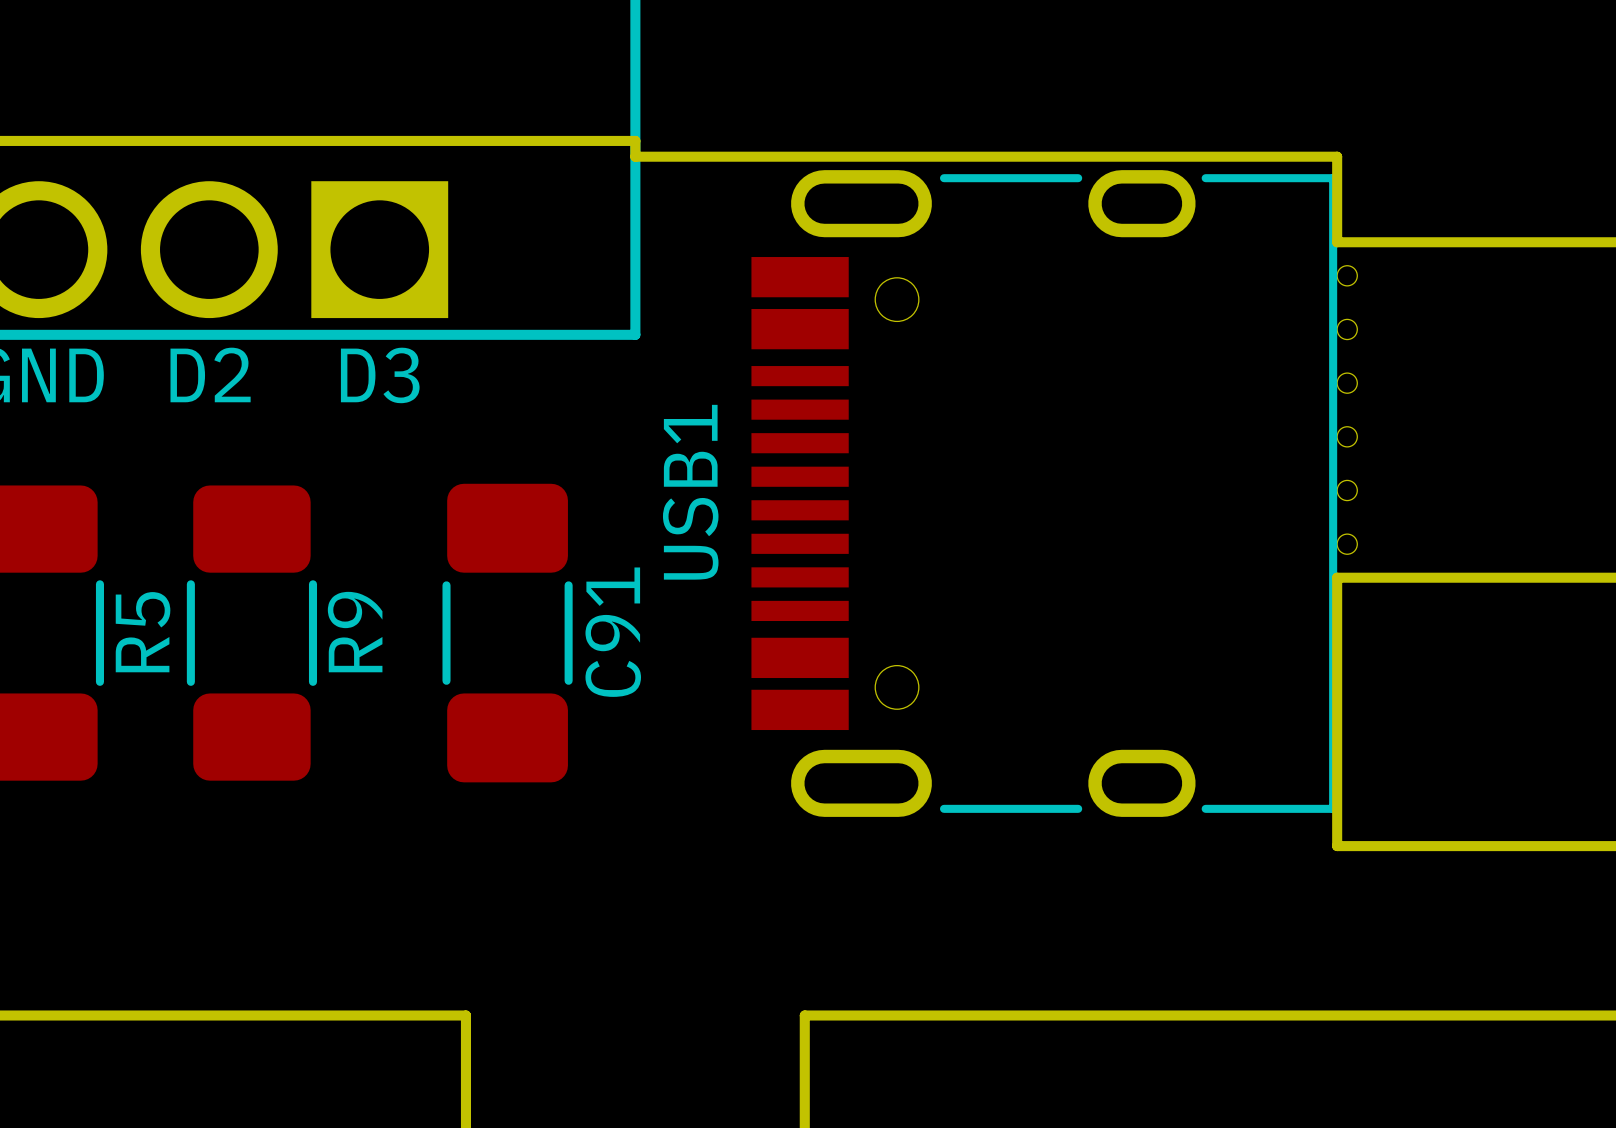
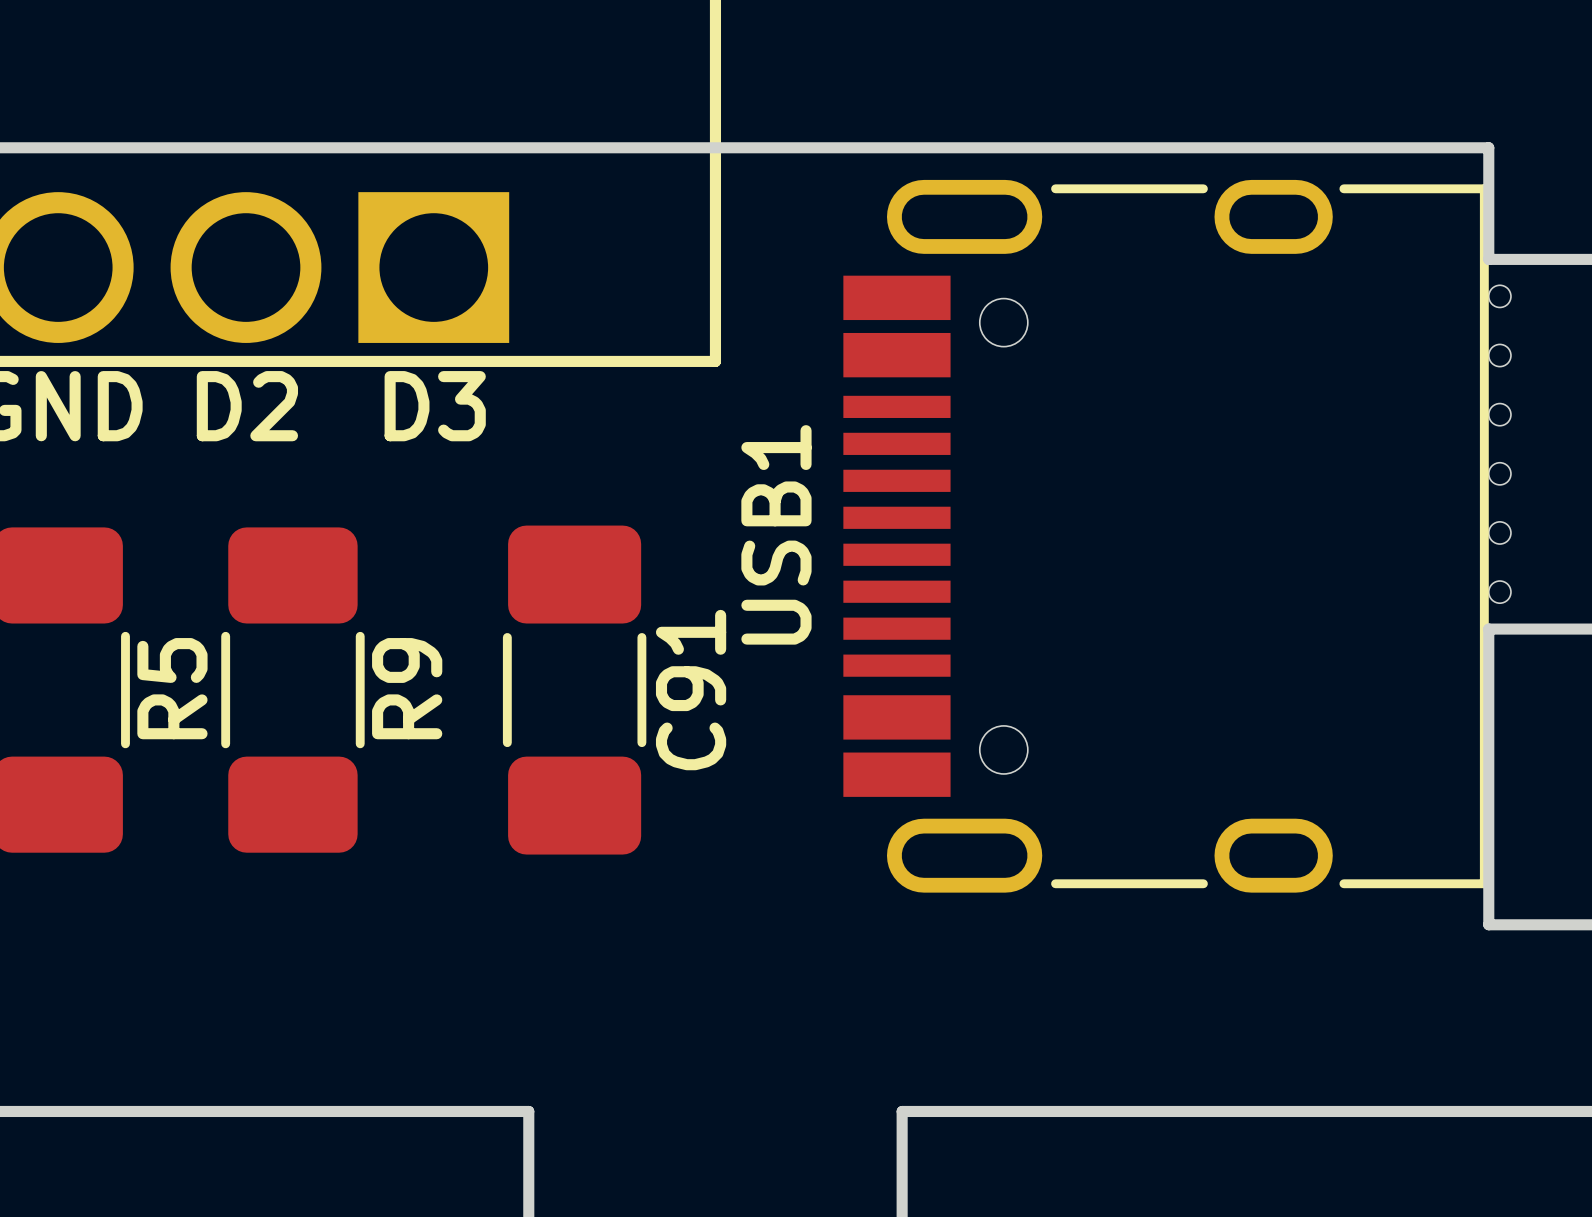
board edge: (635, 140) (635, 156) (1337, 156) -> (715, 147) (1488, 147) (1488, 165)

